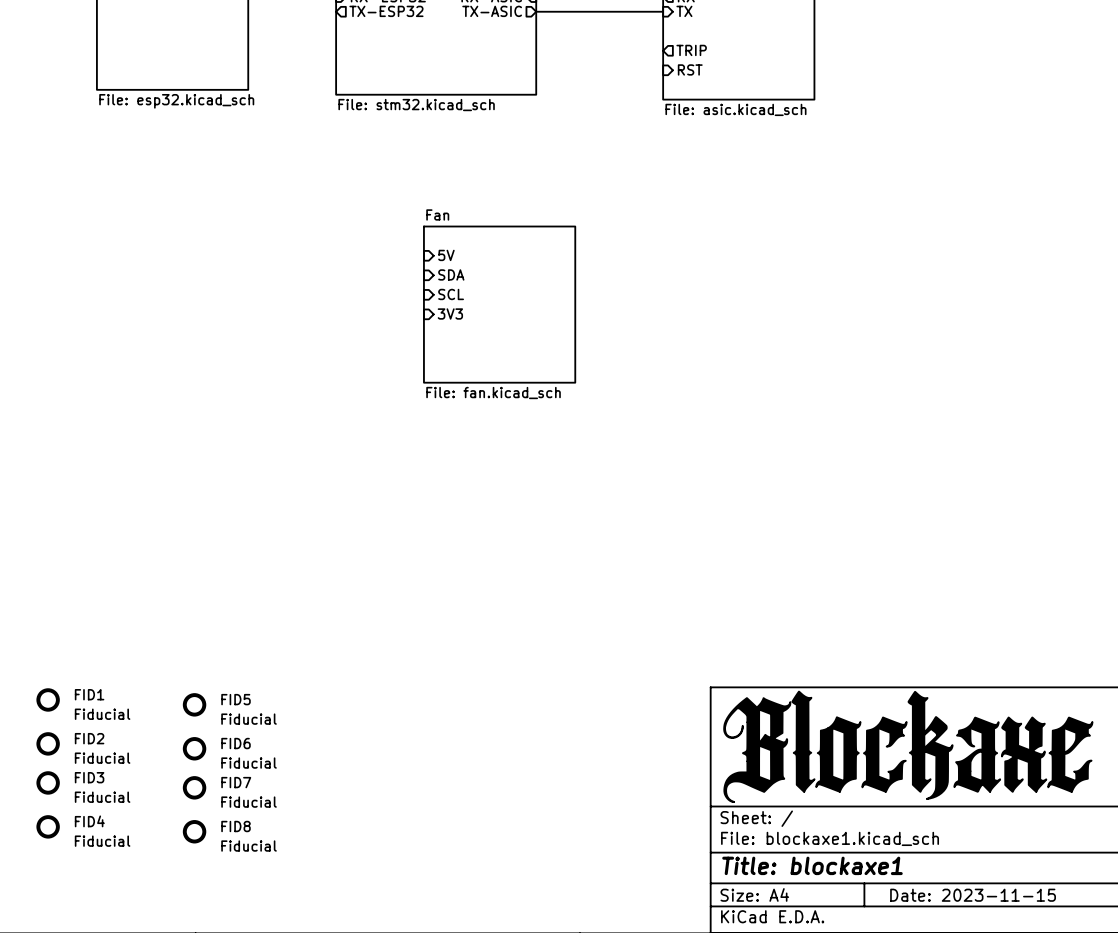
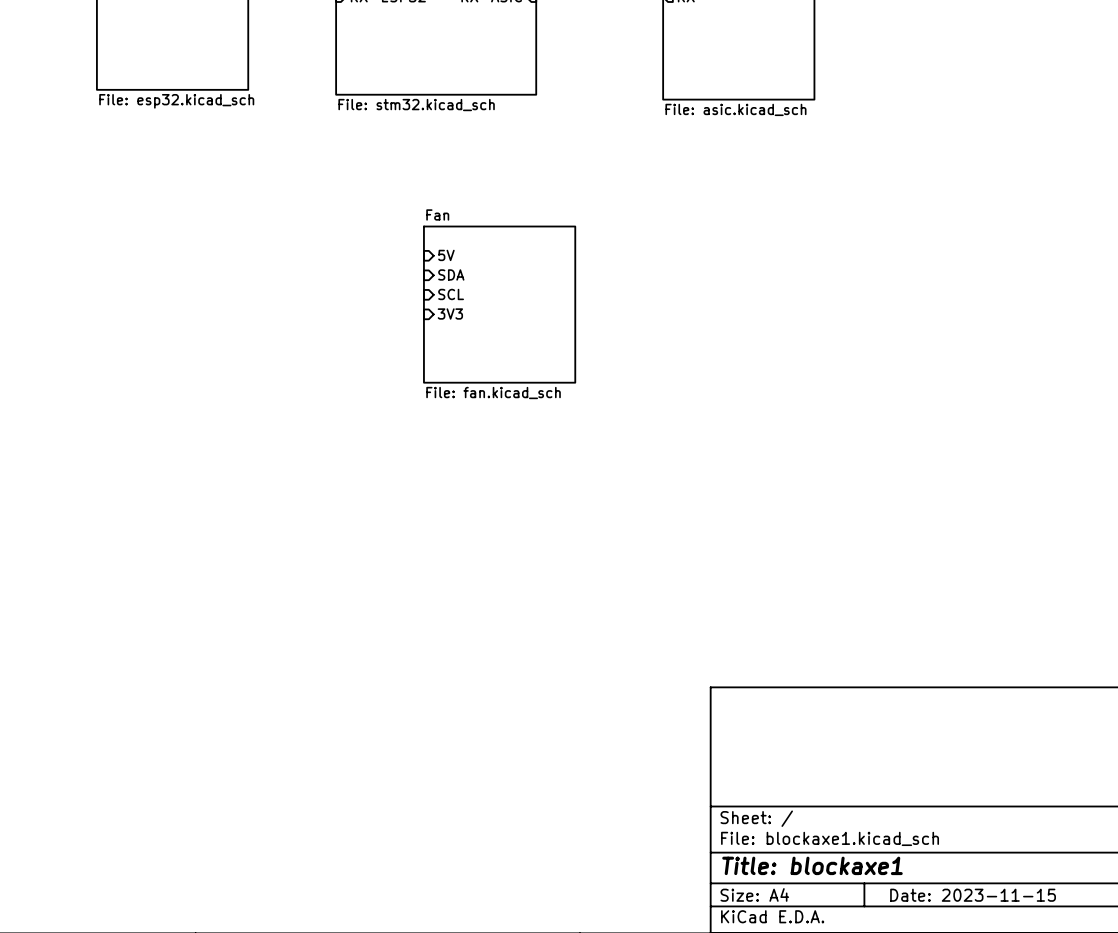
sheet pin: TX-ESP32 (386, 11) -> none
sheet pin: TX-ASIC (492, 11) -> none
wire: (536, 11) (663, 11) -> none
sheet pin: TX (684, 11) -> none
sheet pin: TRIP (691, 50) -> none
sheet pin: RST (690, 69) -> none
drawing: [724, 691, 1093, 803] -> none
FID1: Fiducial (48, 699) -> none
FID5: Fiducial (194, 704) -> none
FID2: Fiducial (48, 743) -> none
FID6: Fiducial (194, 748) -> none
FID3: Fiducial (48, 782) -> none
FID7: Fiducial (194, 787) -> none
FID4: Fiducial (48, 826) -> none
FID8: Fiducial (194, 831) -> none

